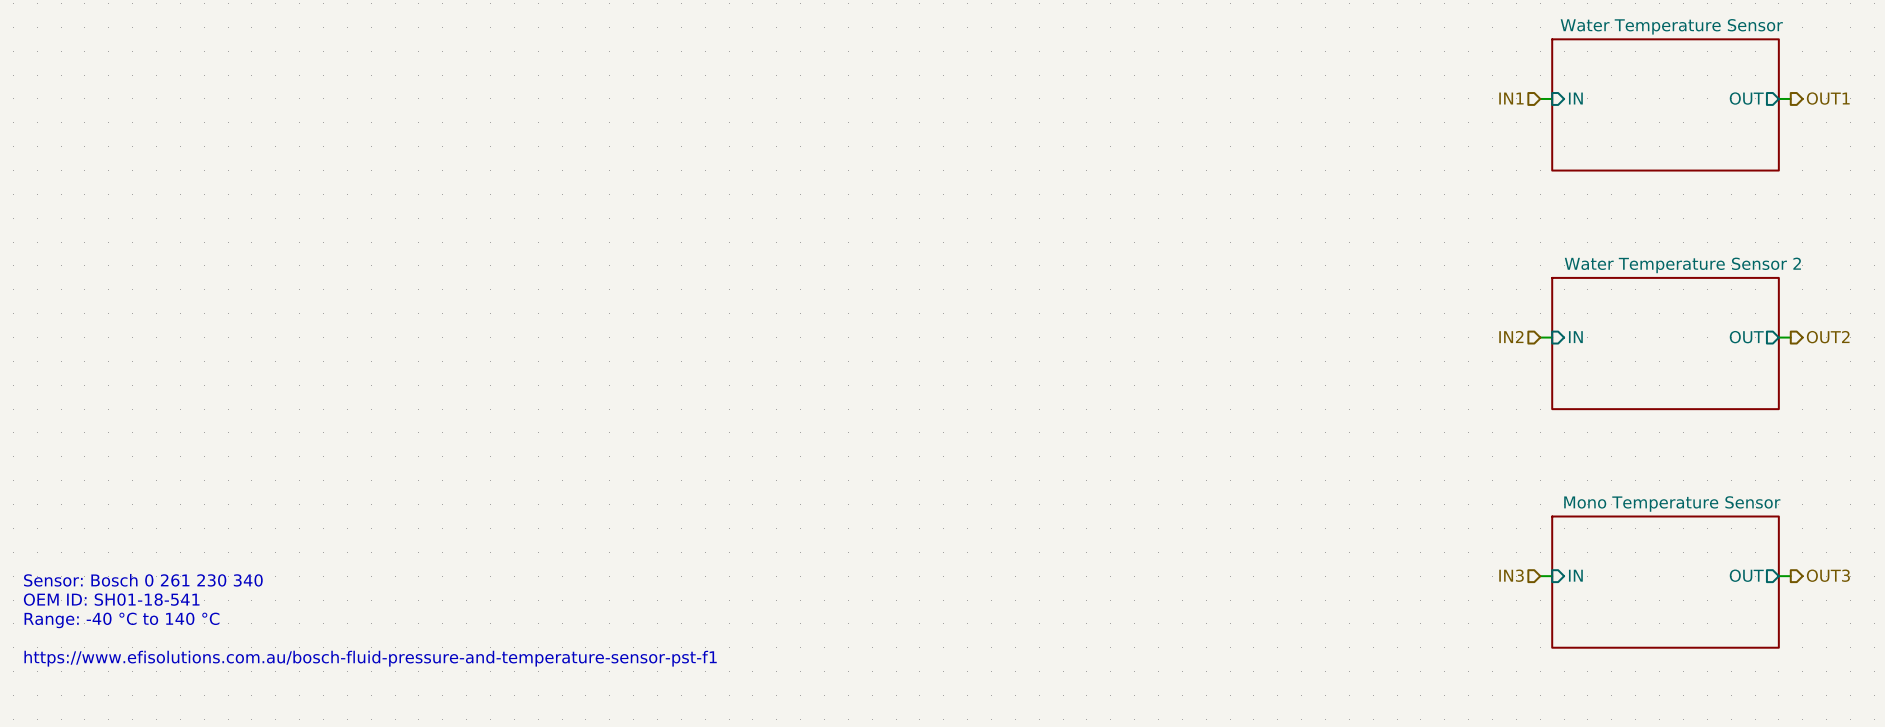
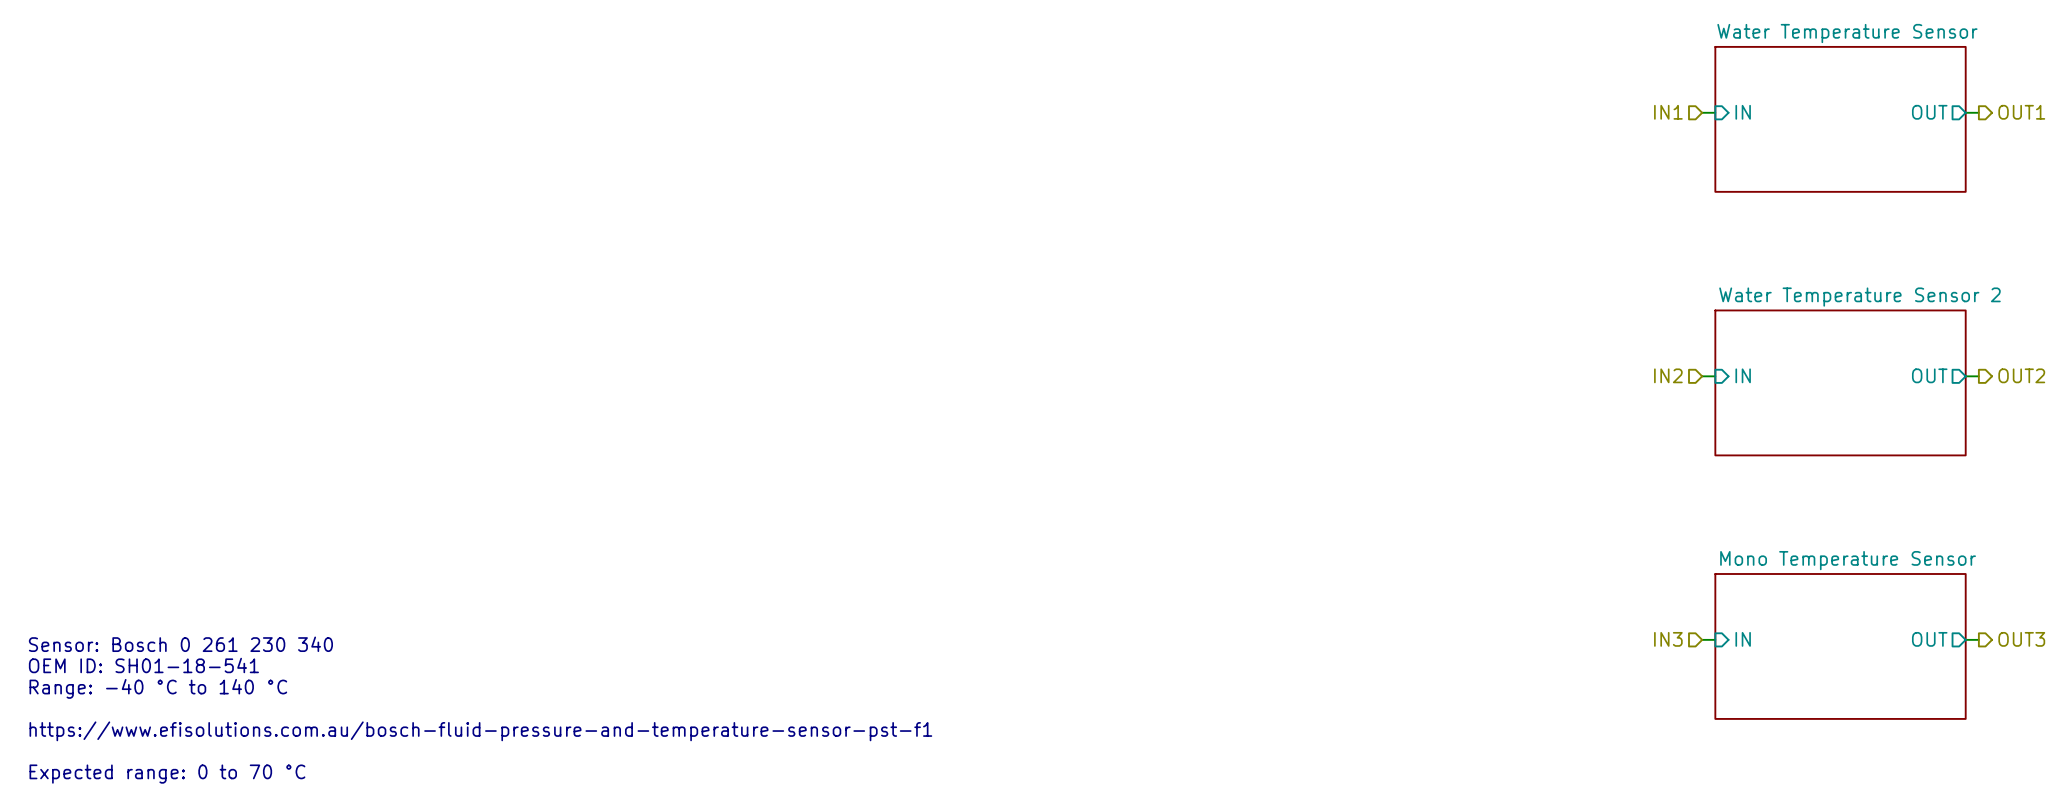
text: none -> Expected range: 0 to 70 °C (167, 774)

